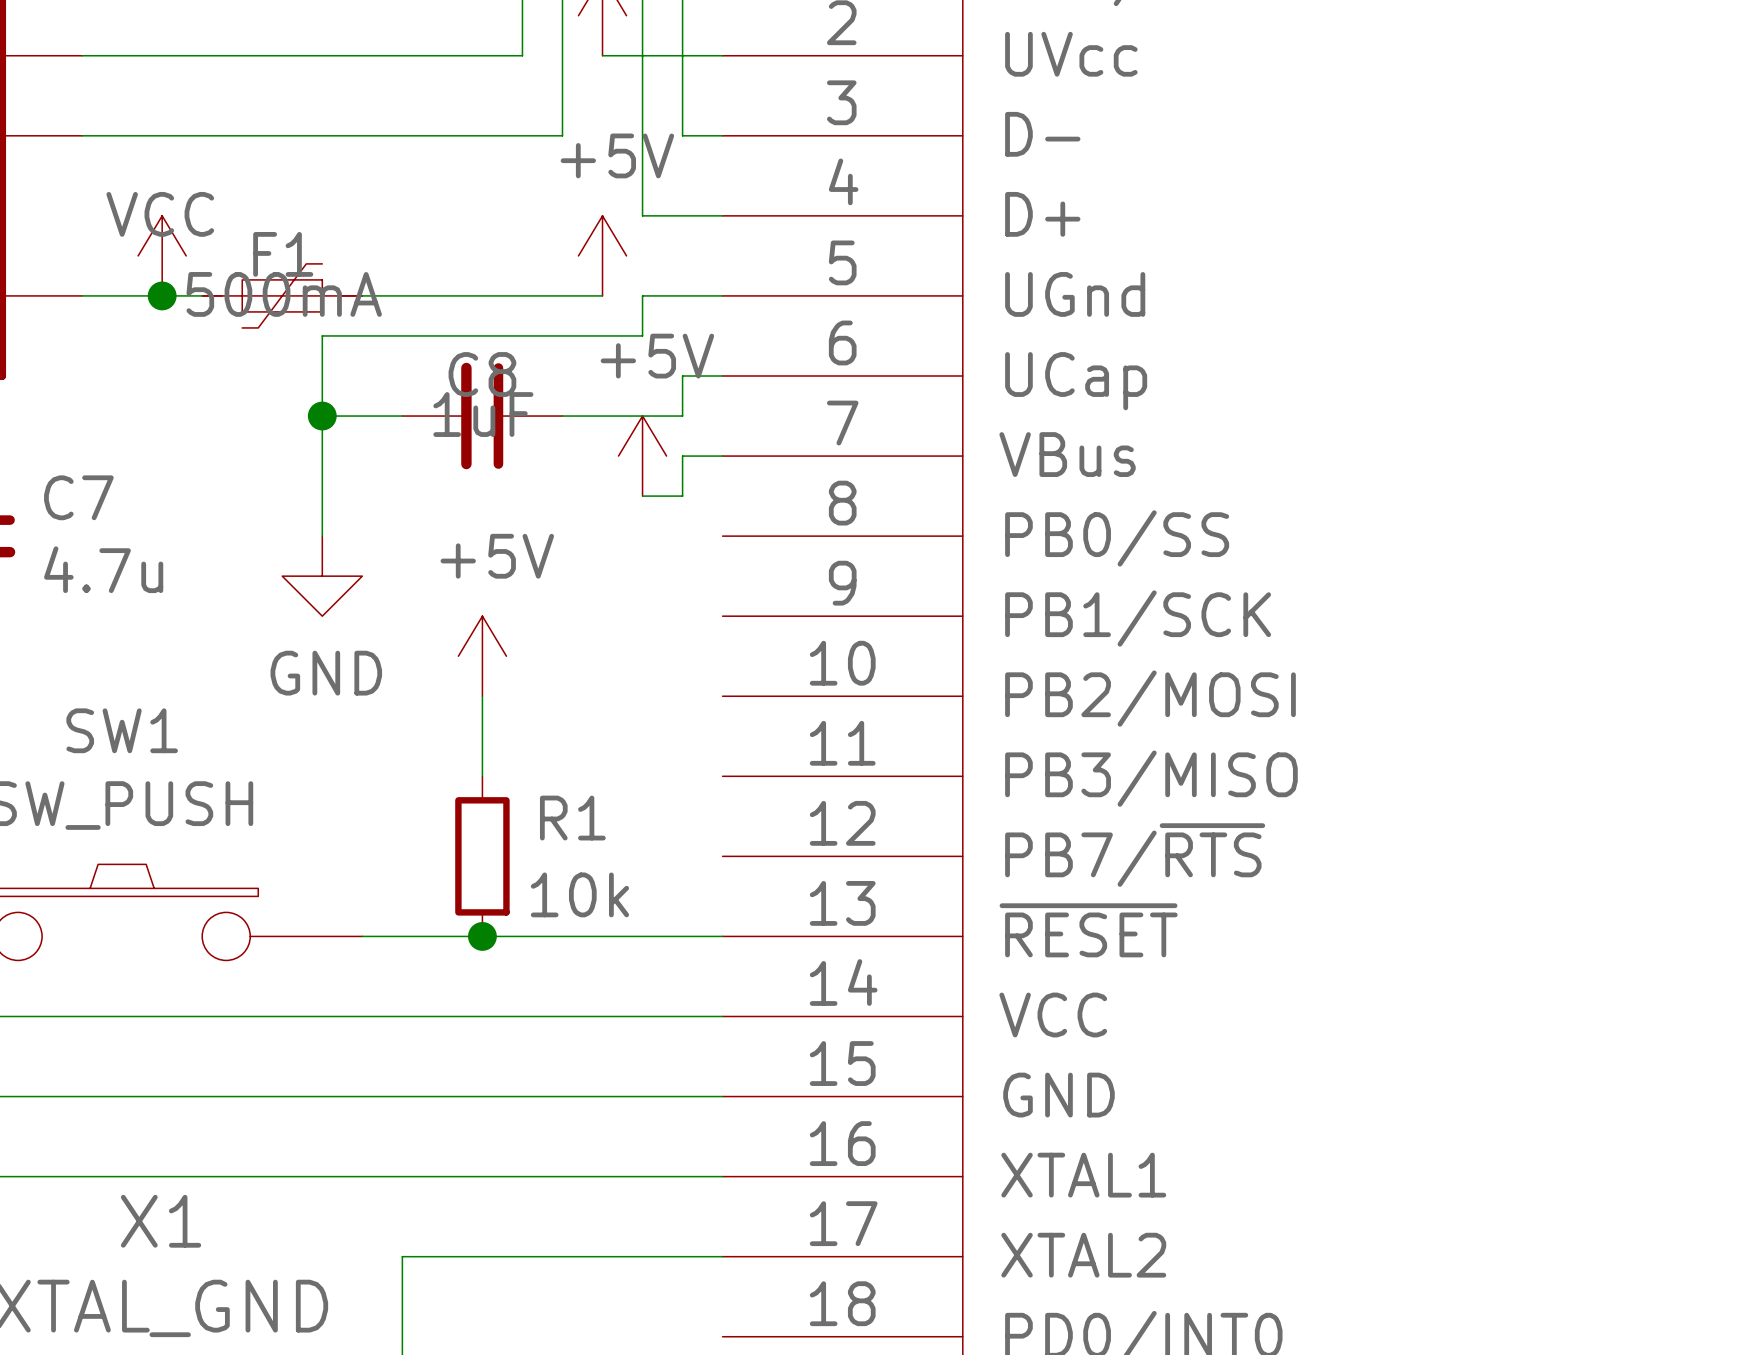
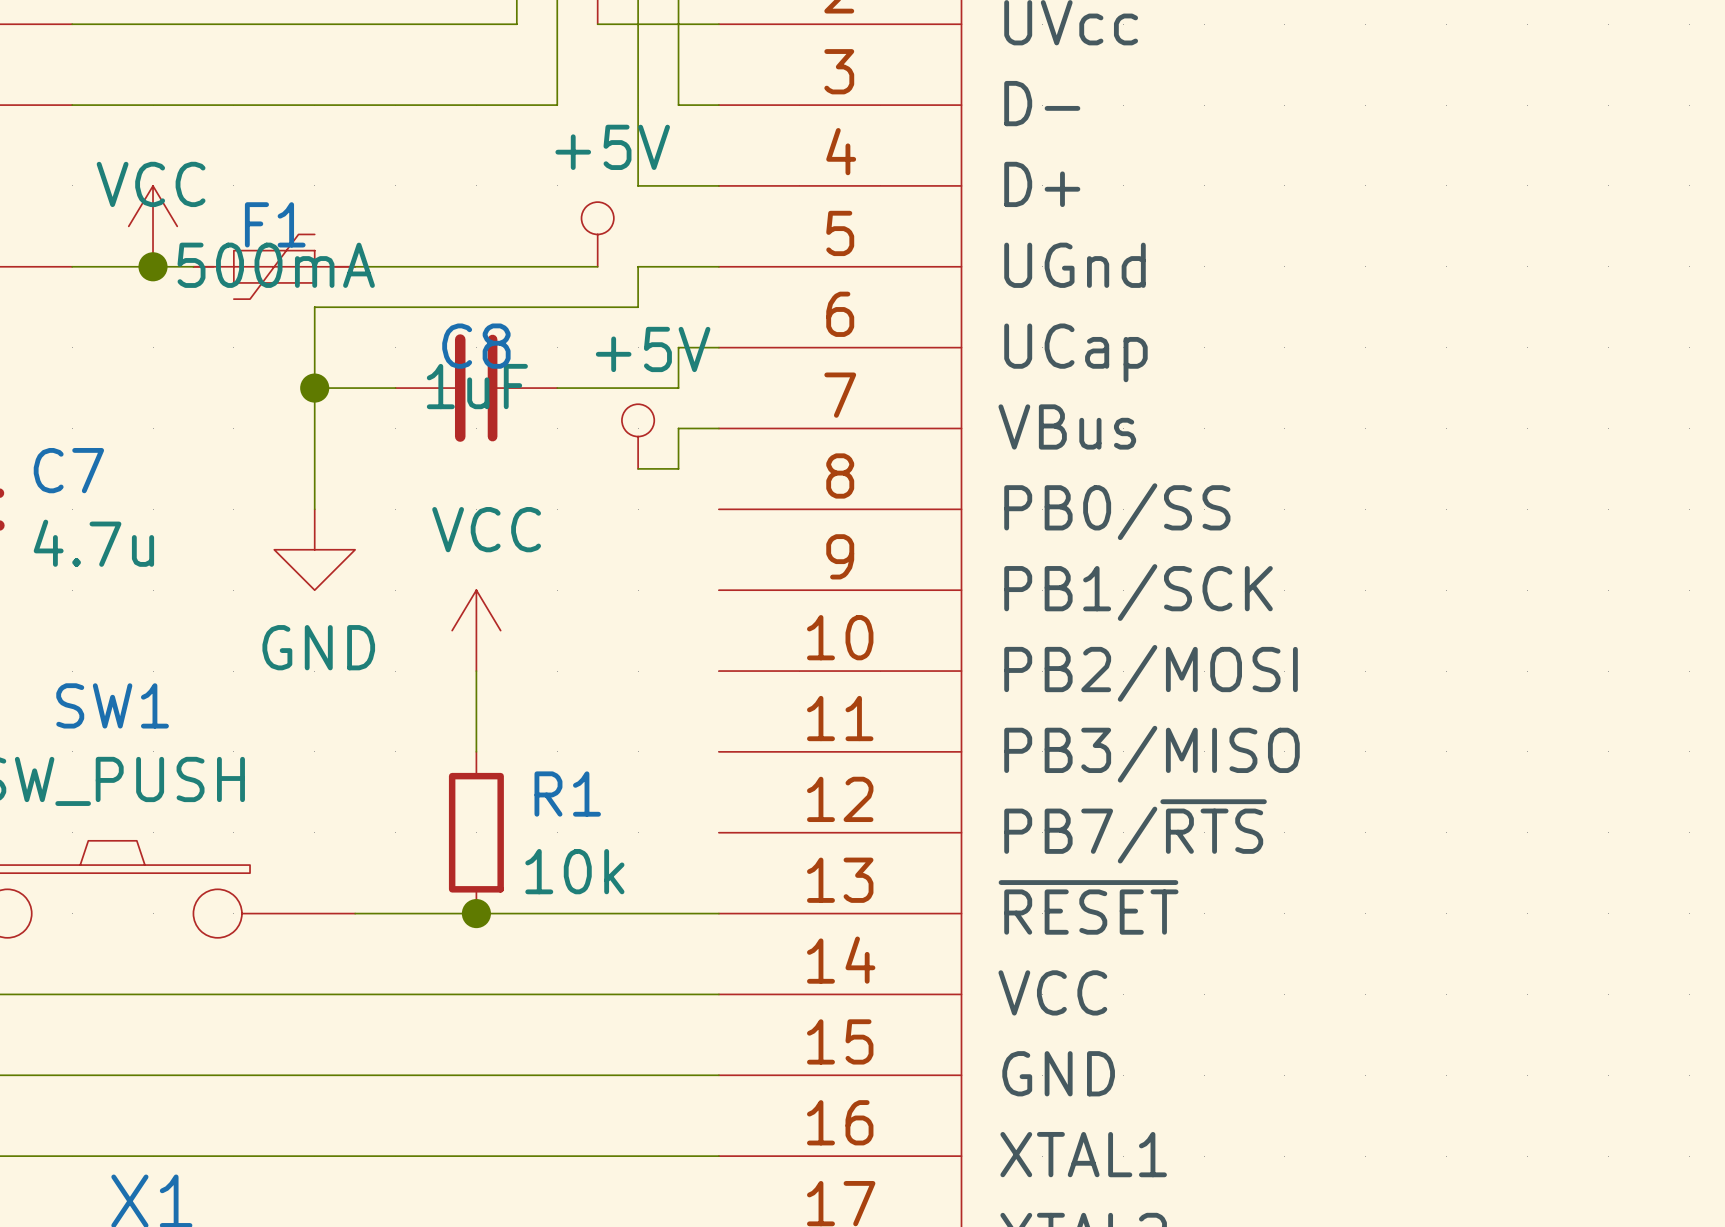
power symbol text position: +5V (617, 155) -> +5V (612, 147)
power symbol shape: [578, 215, 627, 296] -> [581, 202, 614, 267]
power symbol text position: +5V (657, 356) -> +5V (653, 349)
power symbol shape: [618, 416, 667, 497] -> [621, 404, 655, 469]
power symbol: +5V (482, 656) -> VCC (476, 630)

